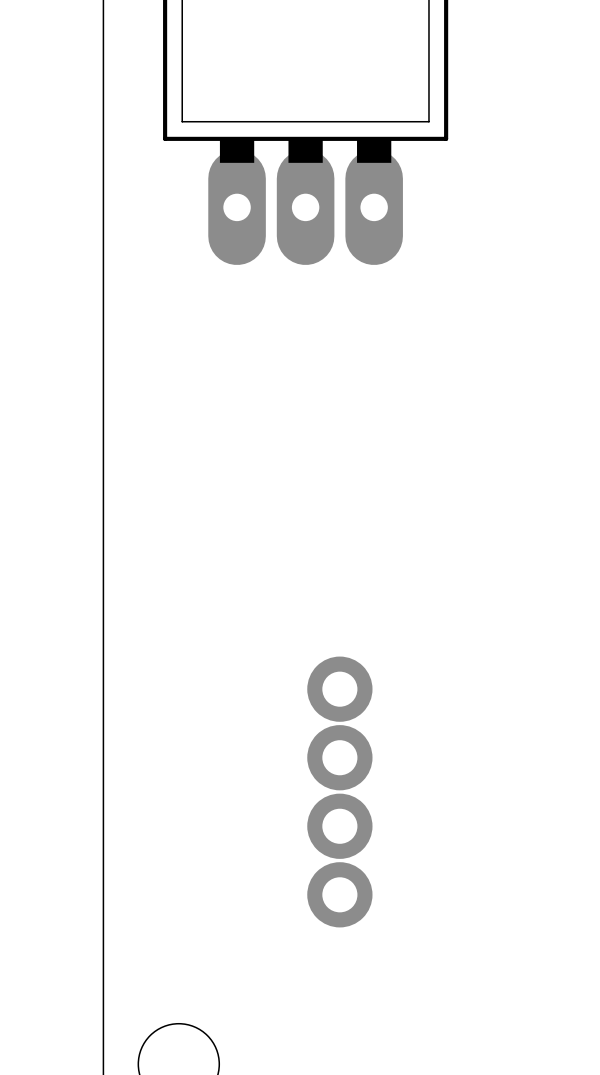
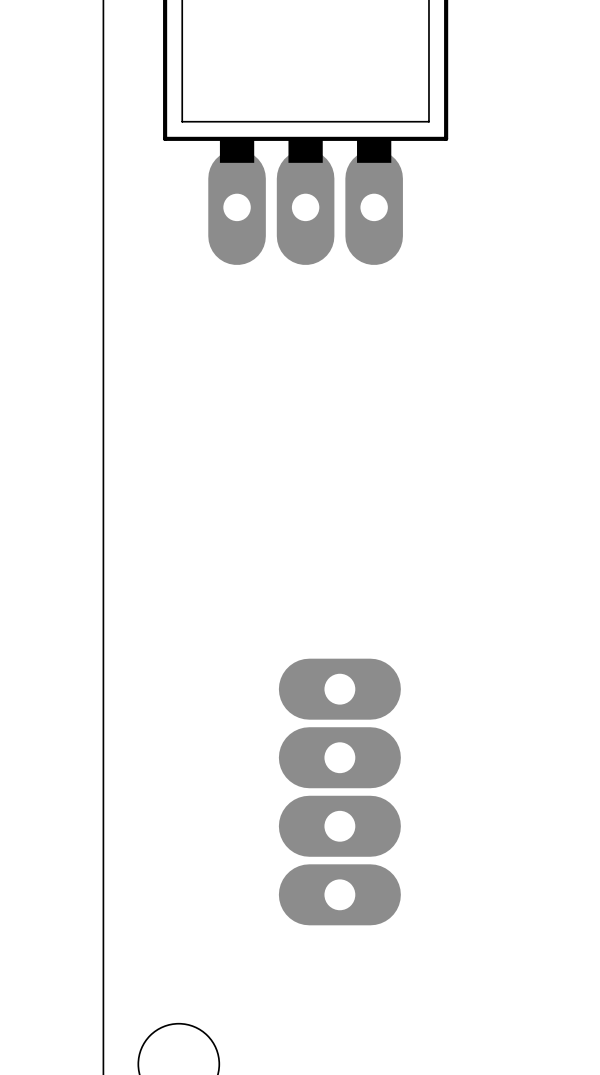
part footprint: [307, 656, 373, 928] -> [278, 658, 401, 926]

